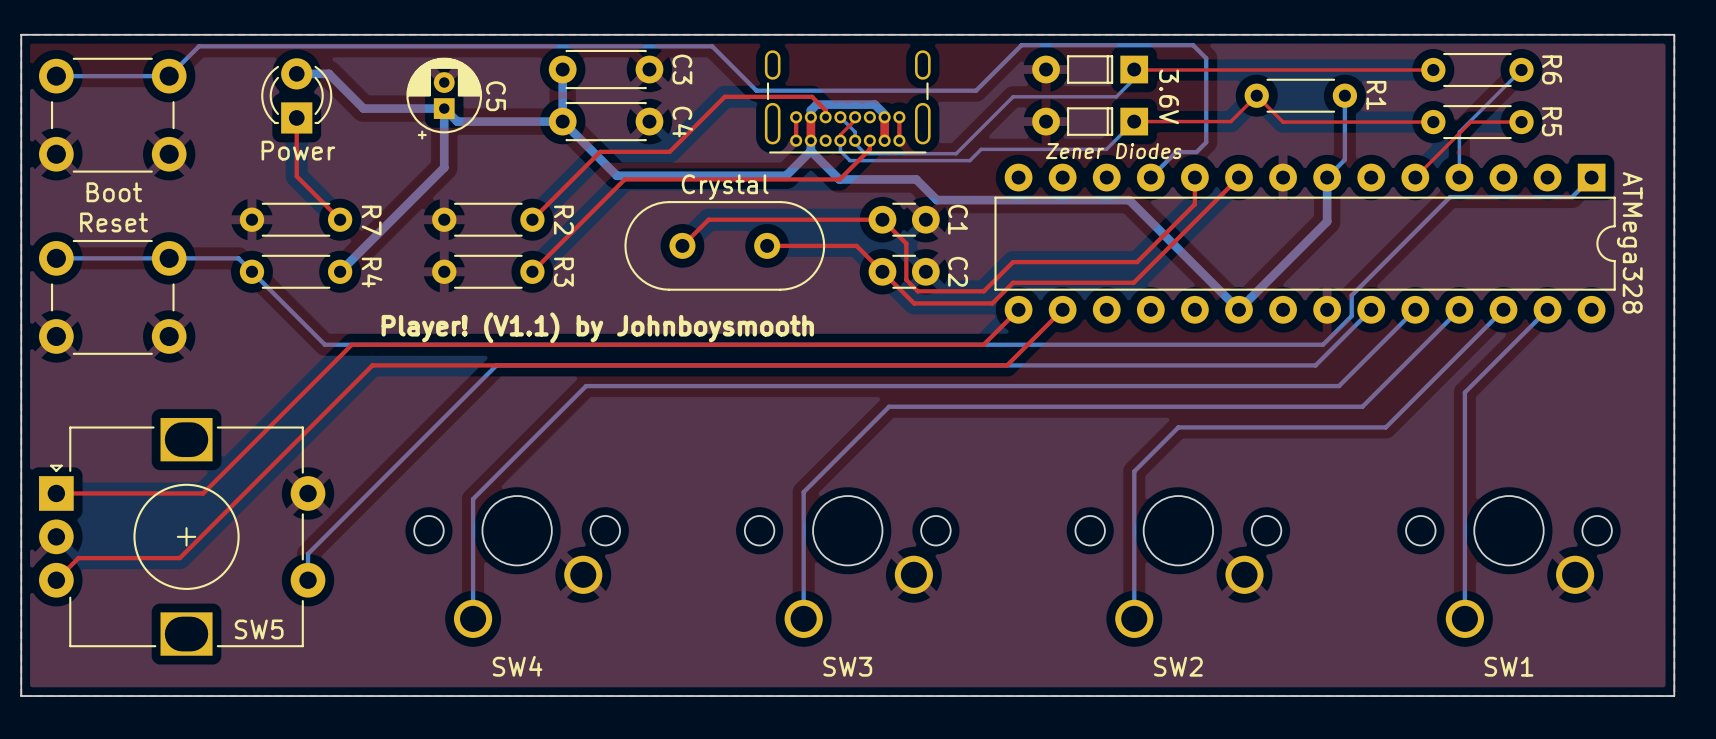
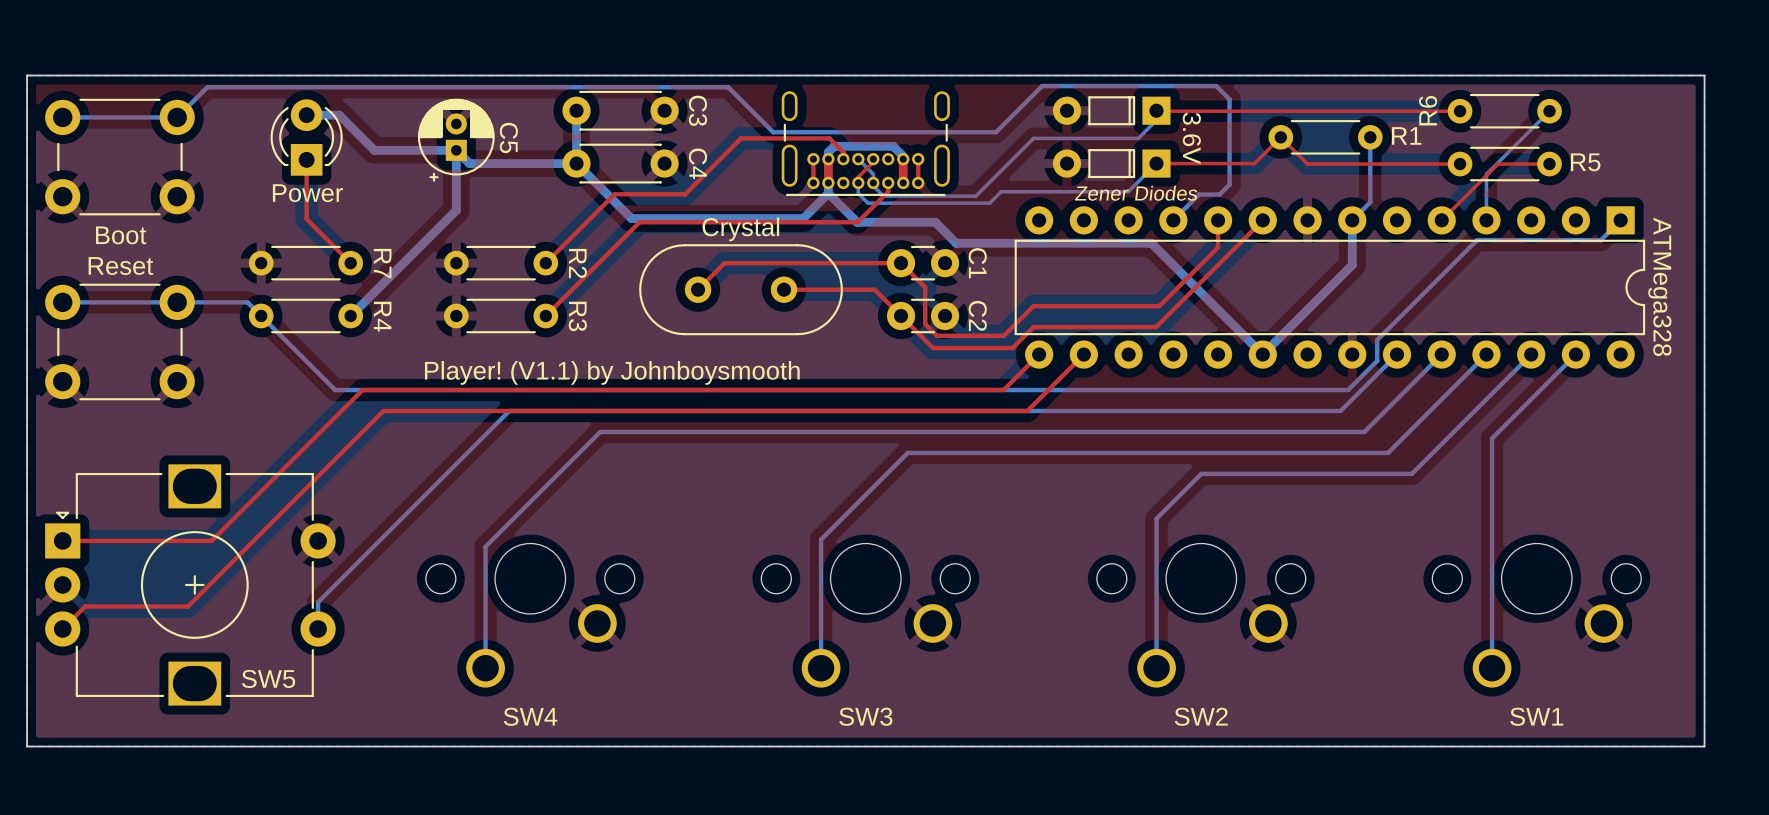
R6 name rotation: 0° (1552, 69) -> 180° (1428, 110)
R6 name position: R6 (1552, 69) -> R6 (1428, 110)
R1 name rotation: 0° (1376, 95) -> 90° counterclockwise (1406, 135)
R5 name rotation: 0° (1551, 121) -> 90° counterclockwise (1585, 162)

